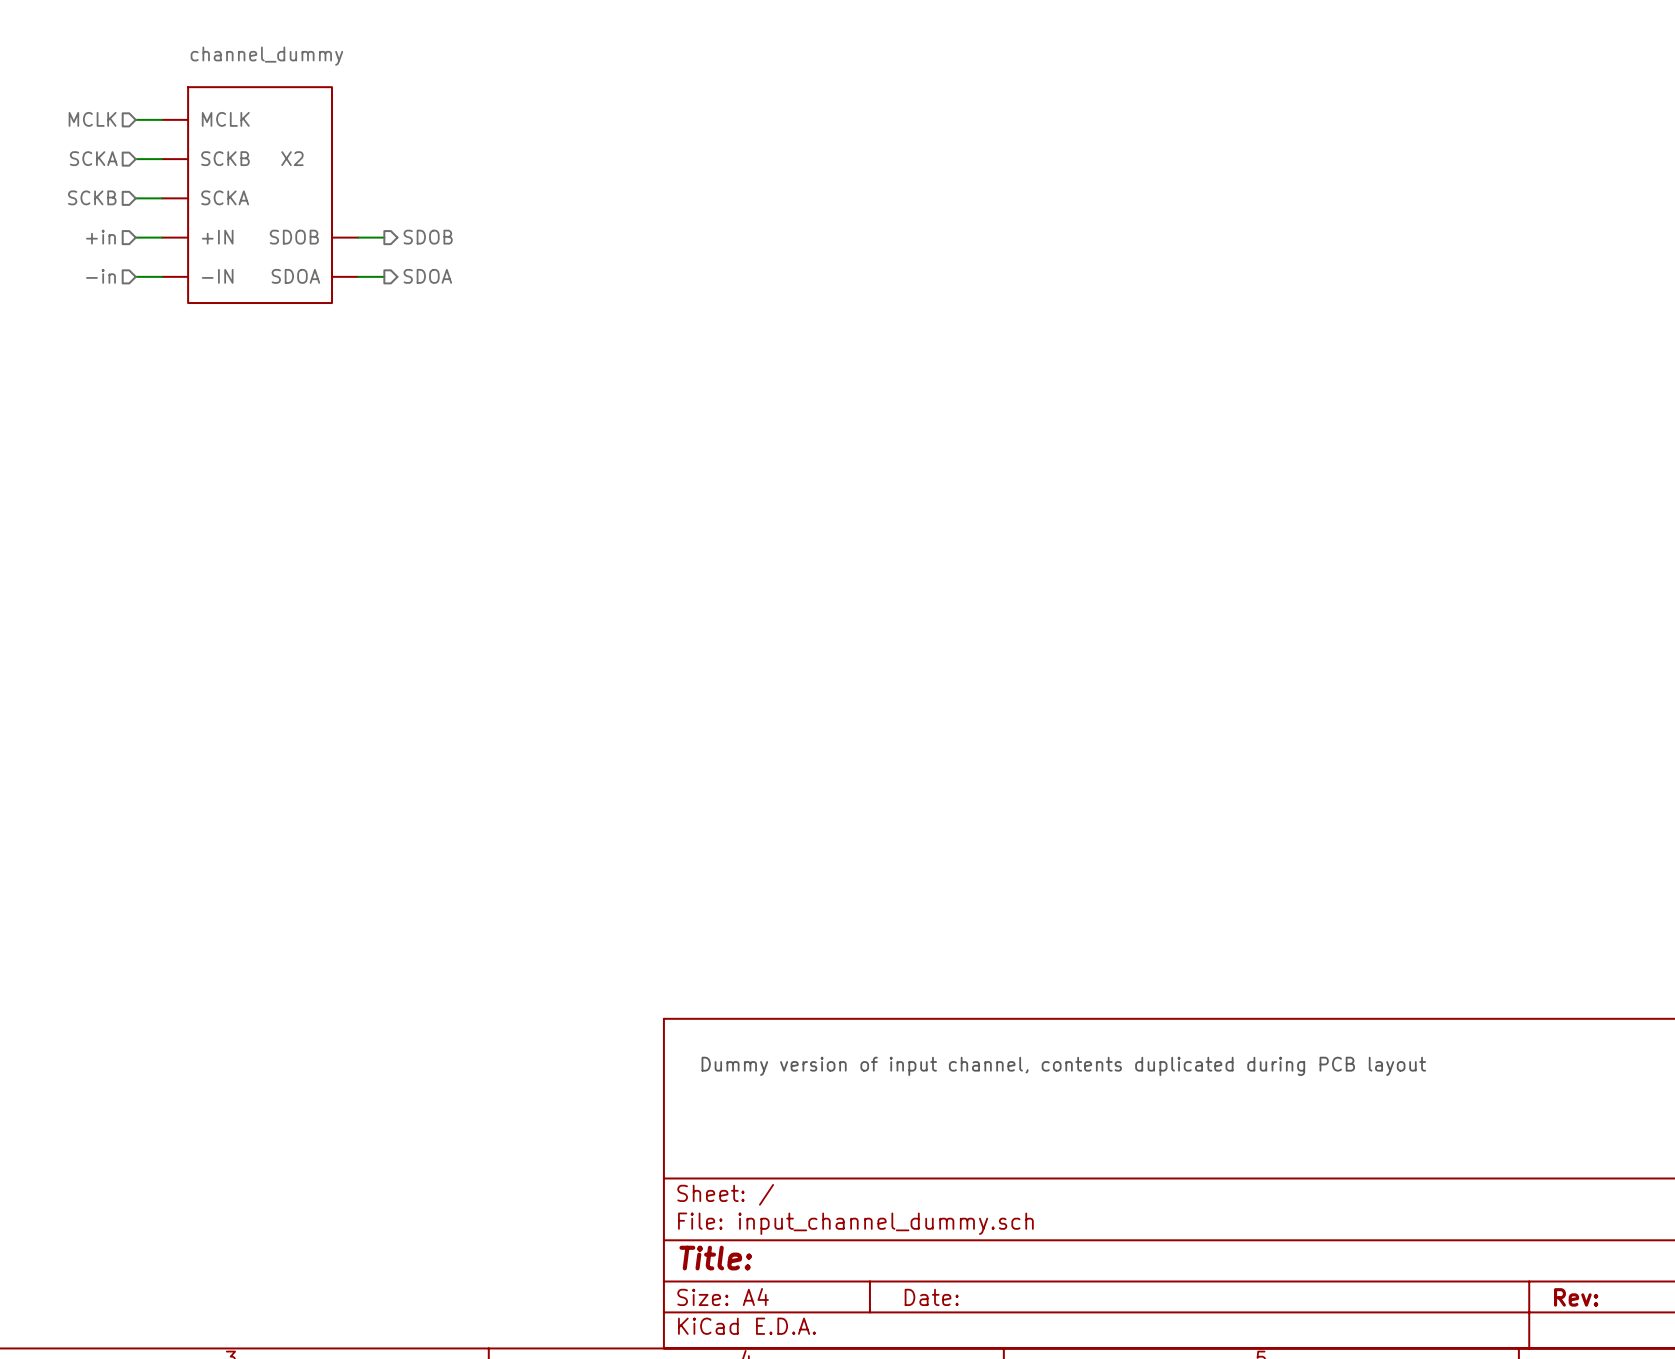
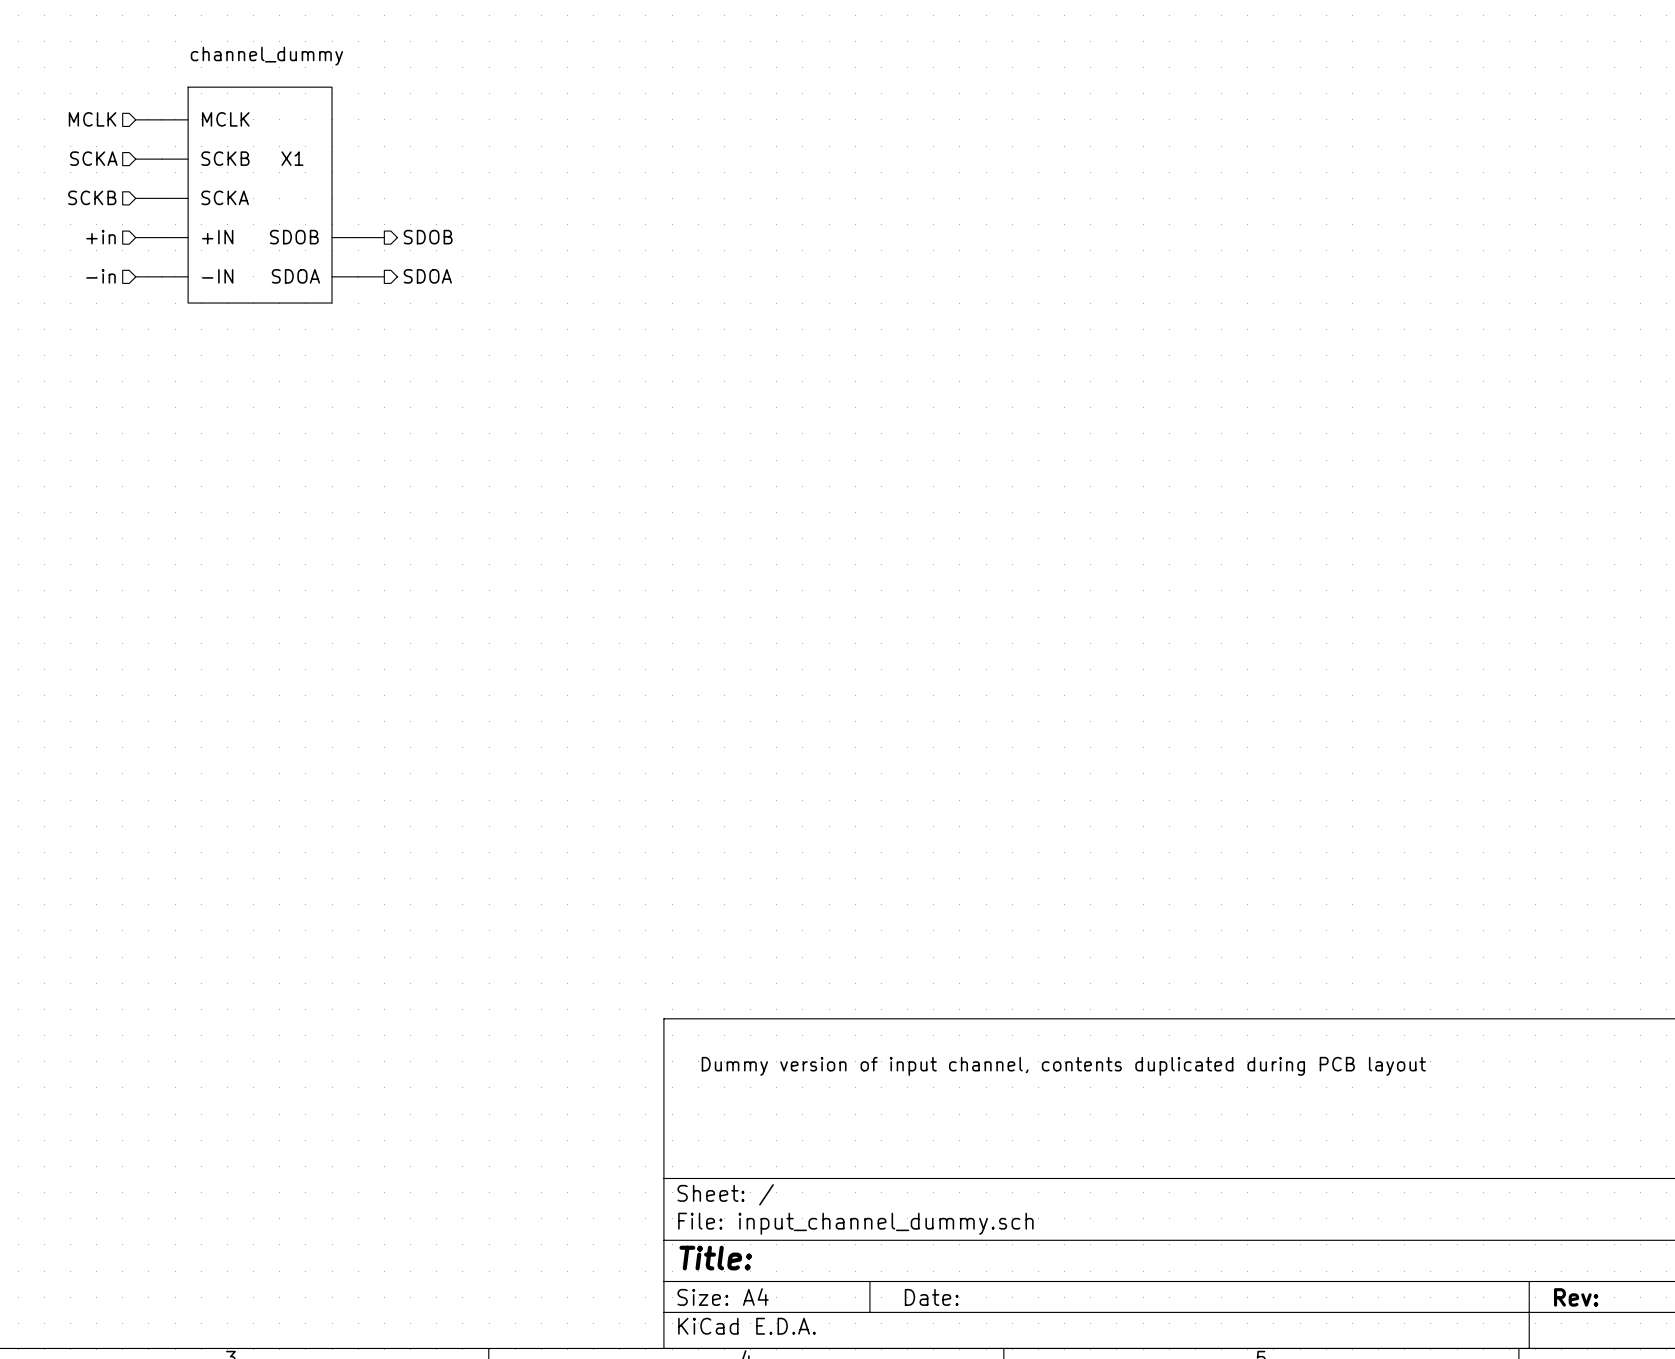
X2 name: X2 (292, 158) -> X1 (292, 158)

